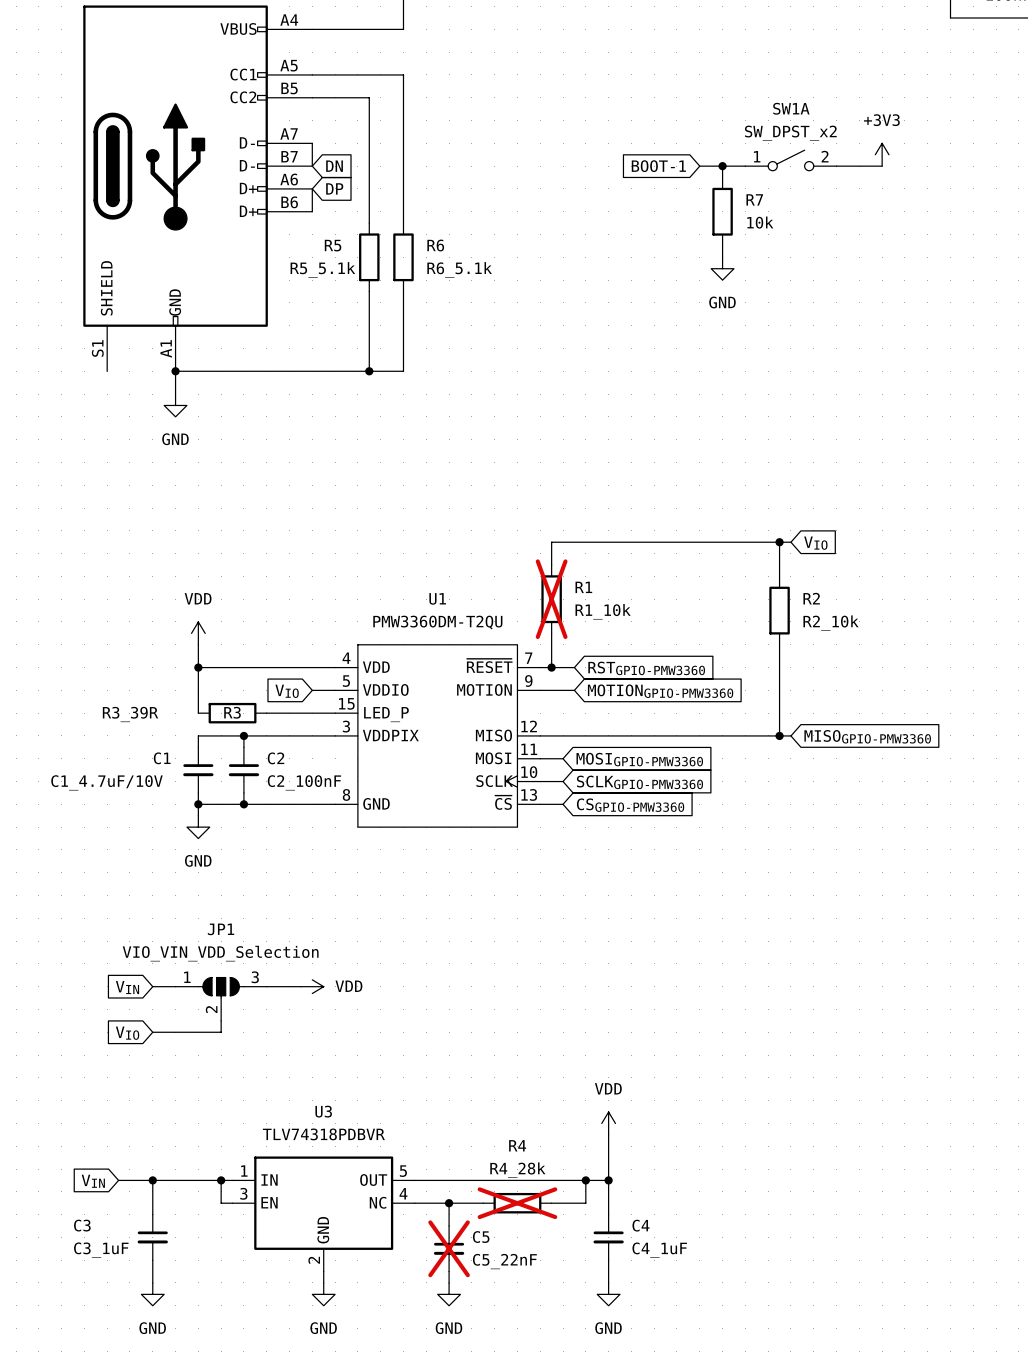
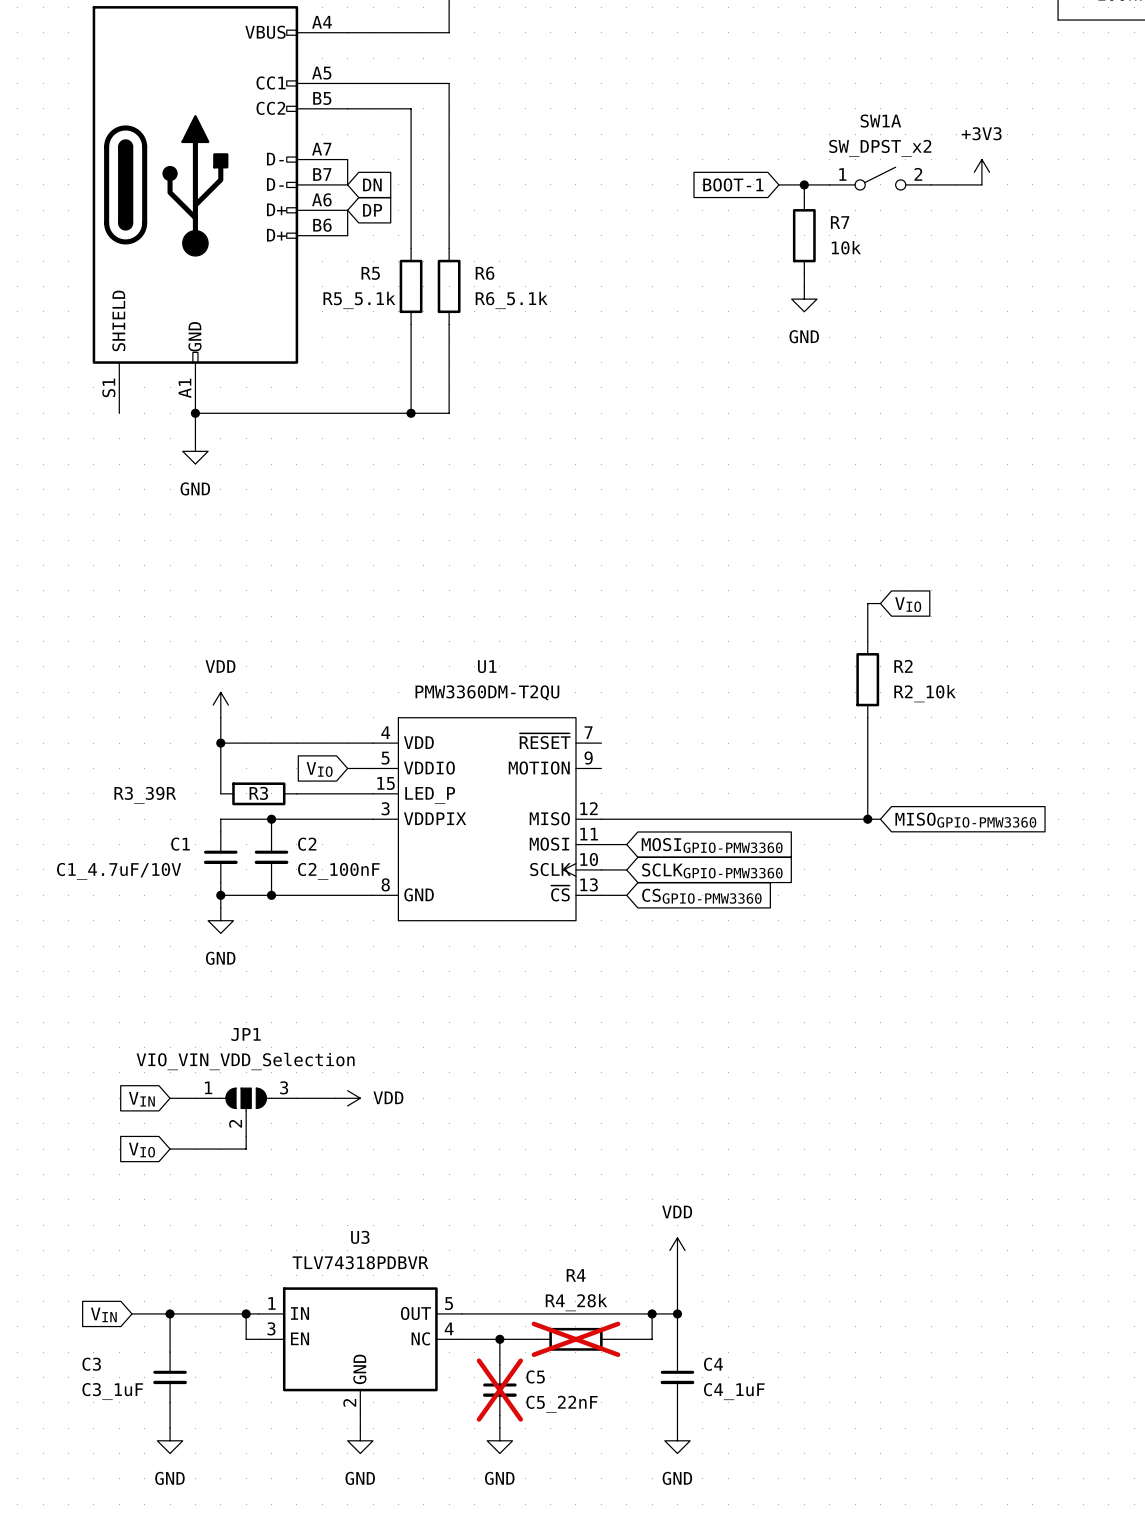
wire: (779, 542) (551, 542) (551, 565) -> none
junction: (779, 542) -> none
R1: R1_10k (551, 599) -> none
wire: (551, 633) (551, 667) -> none
wire: (540, 667) (574, 667) -> none
junction: (551, 667) -> none
global label: RSTGPIO-PMW3360 (646, 668) -> none
wire: (540, 690) (574, 690) -> none
global label: MOTIONGPIO-PMW3360 (660, 691) -> none

